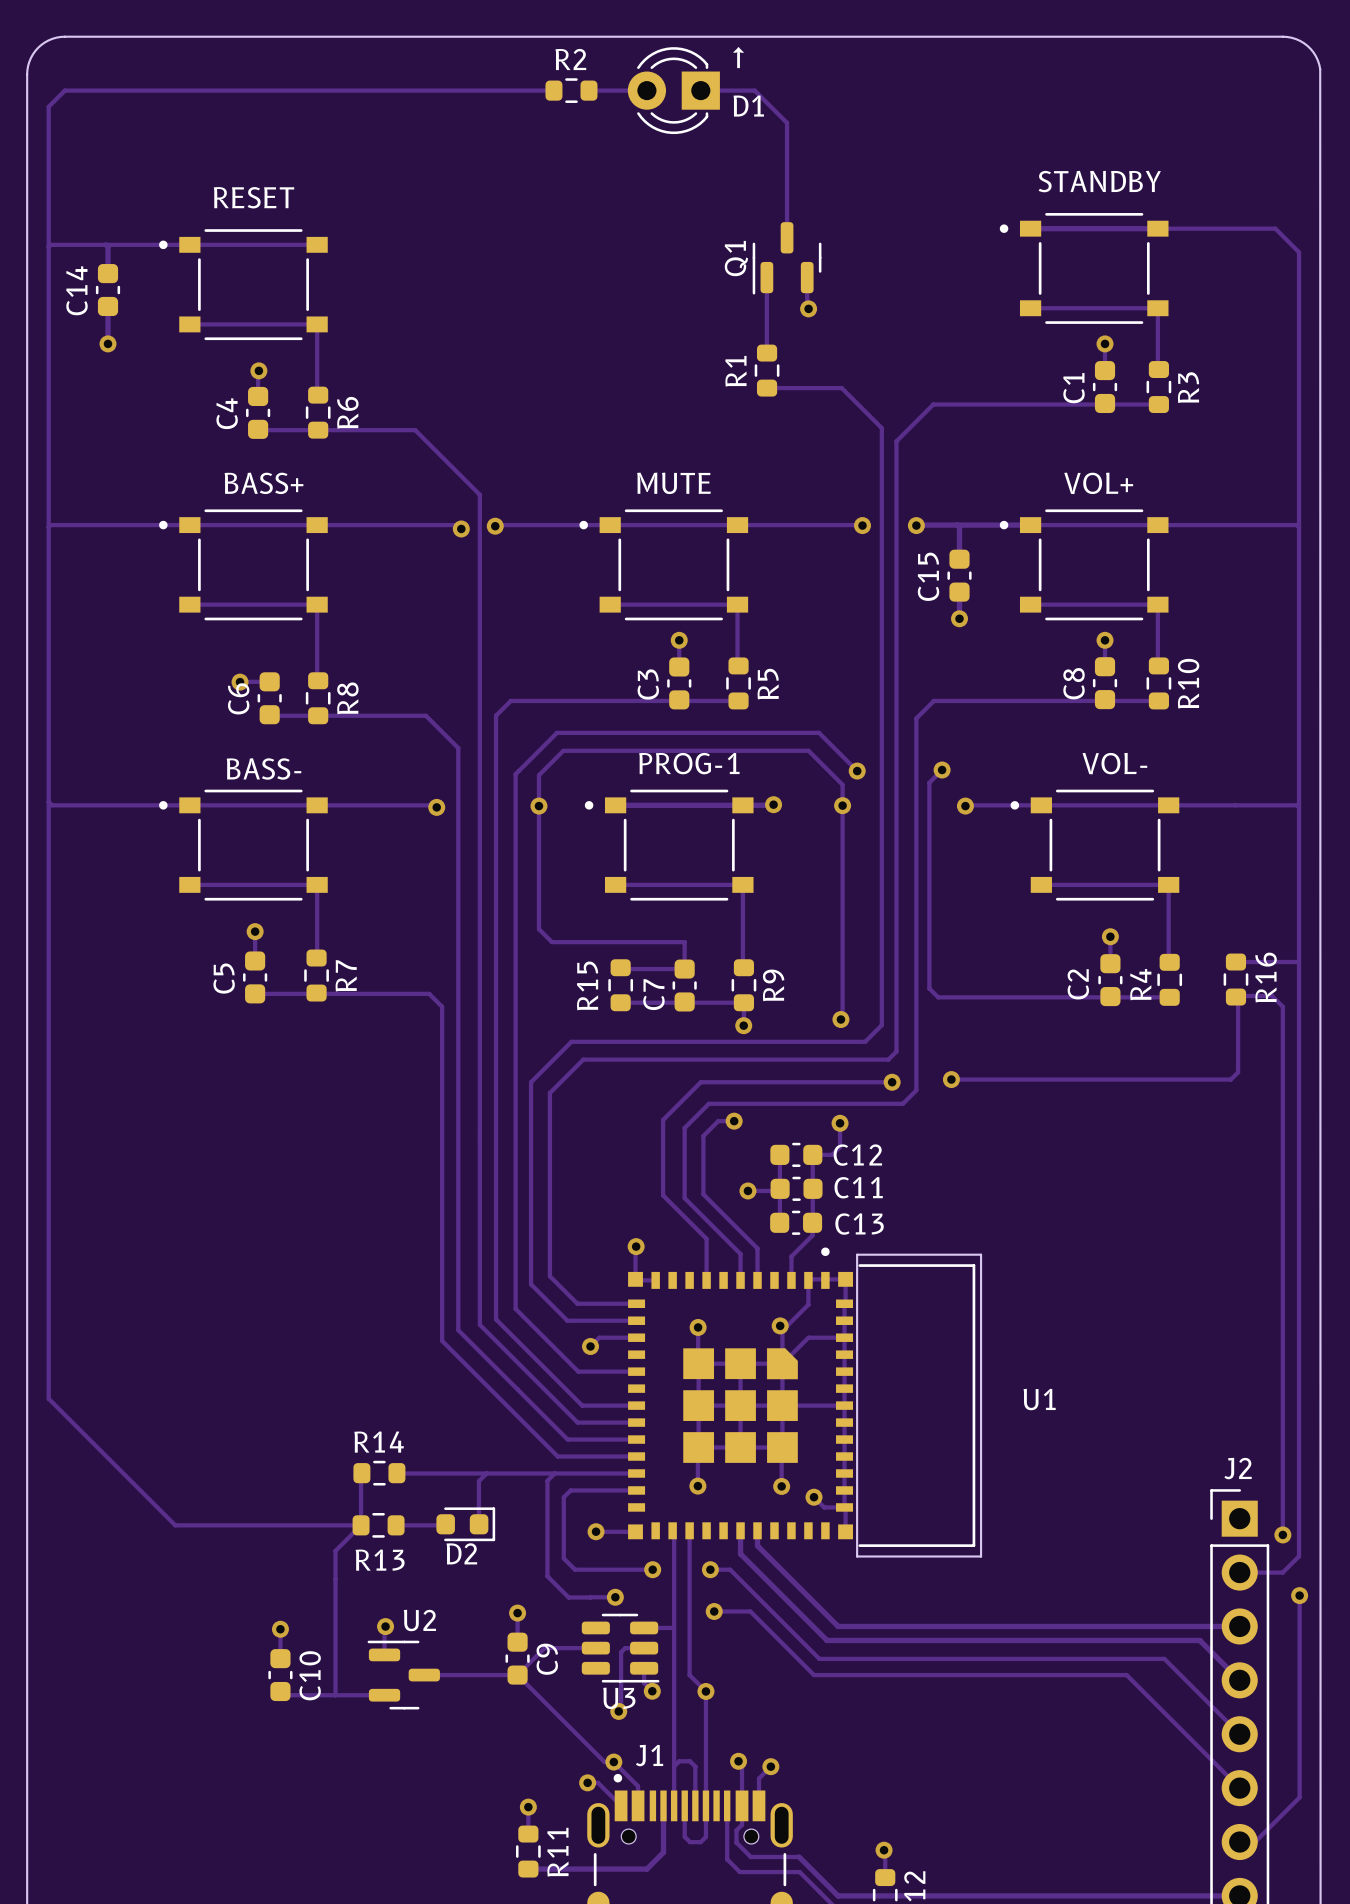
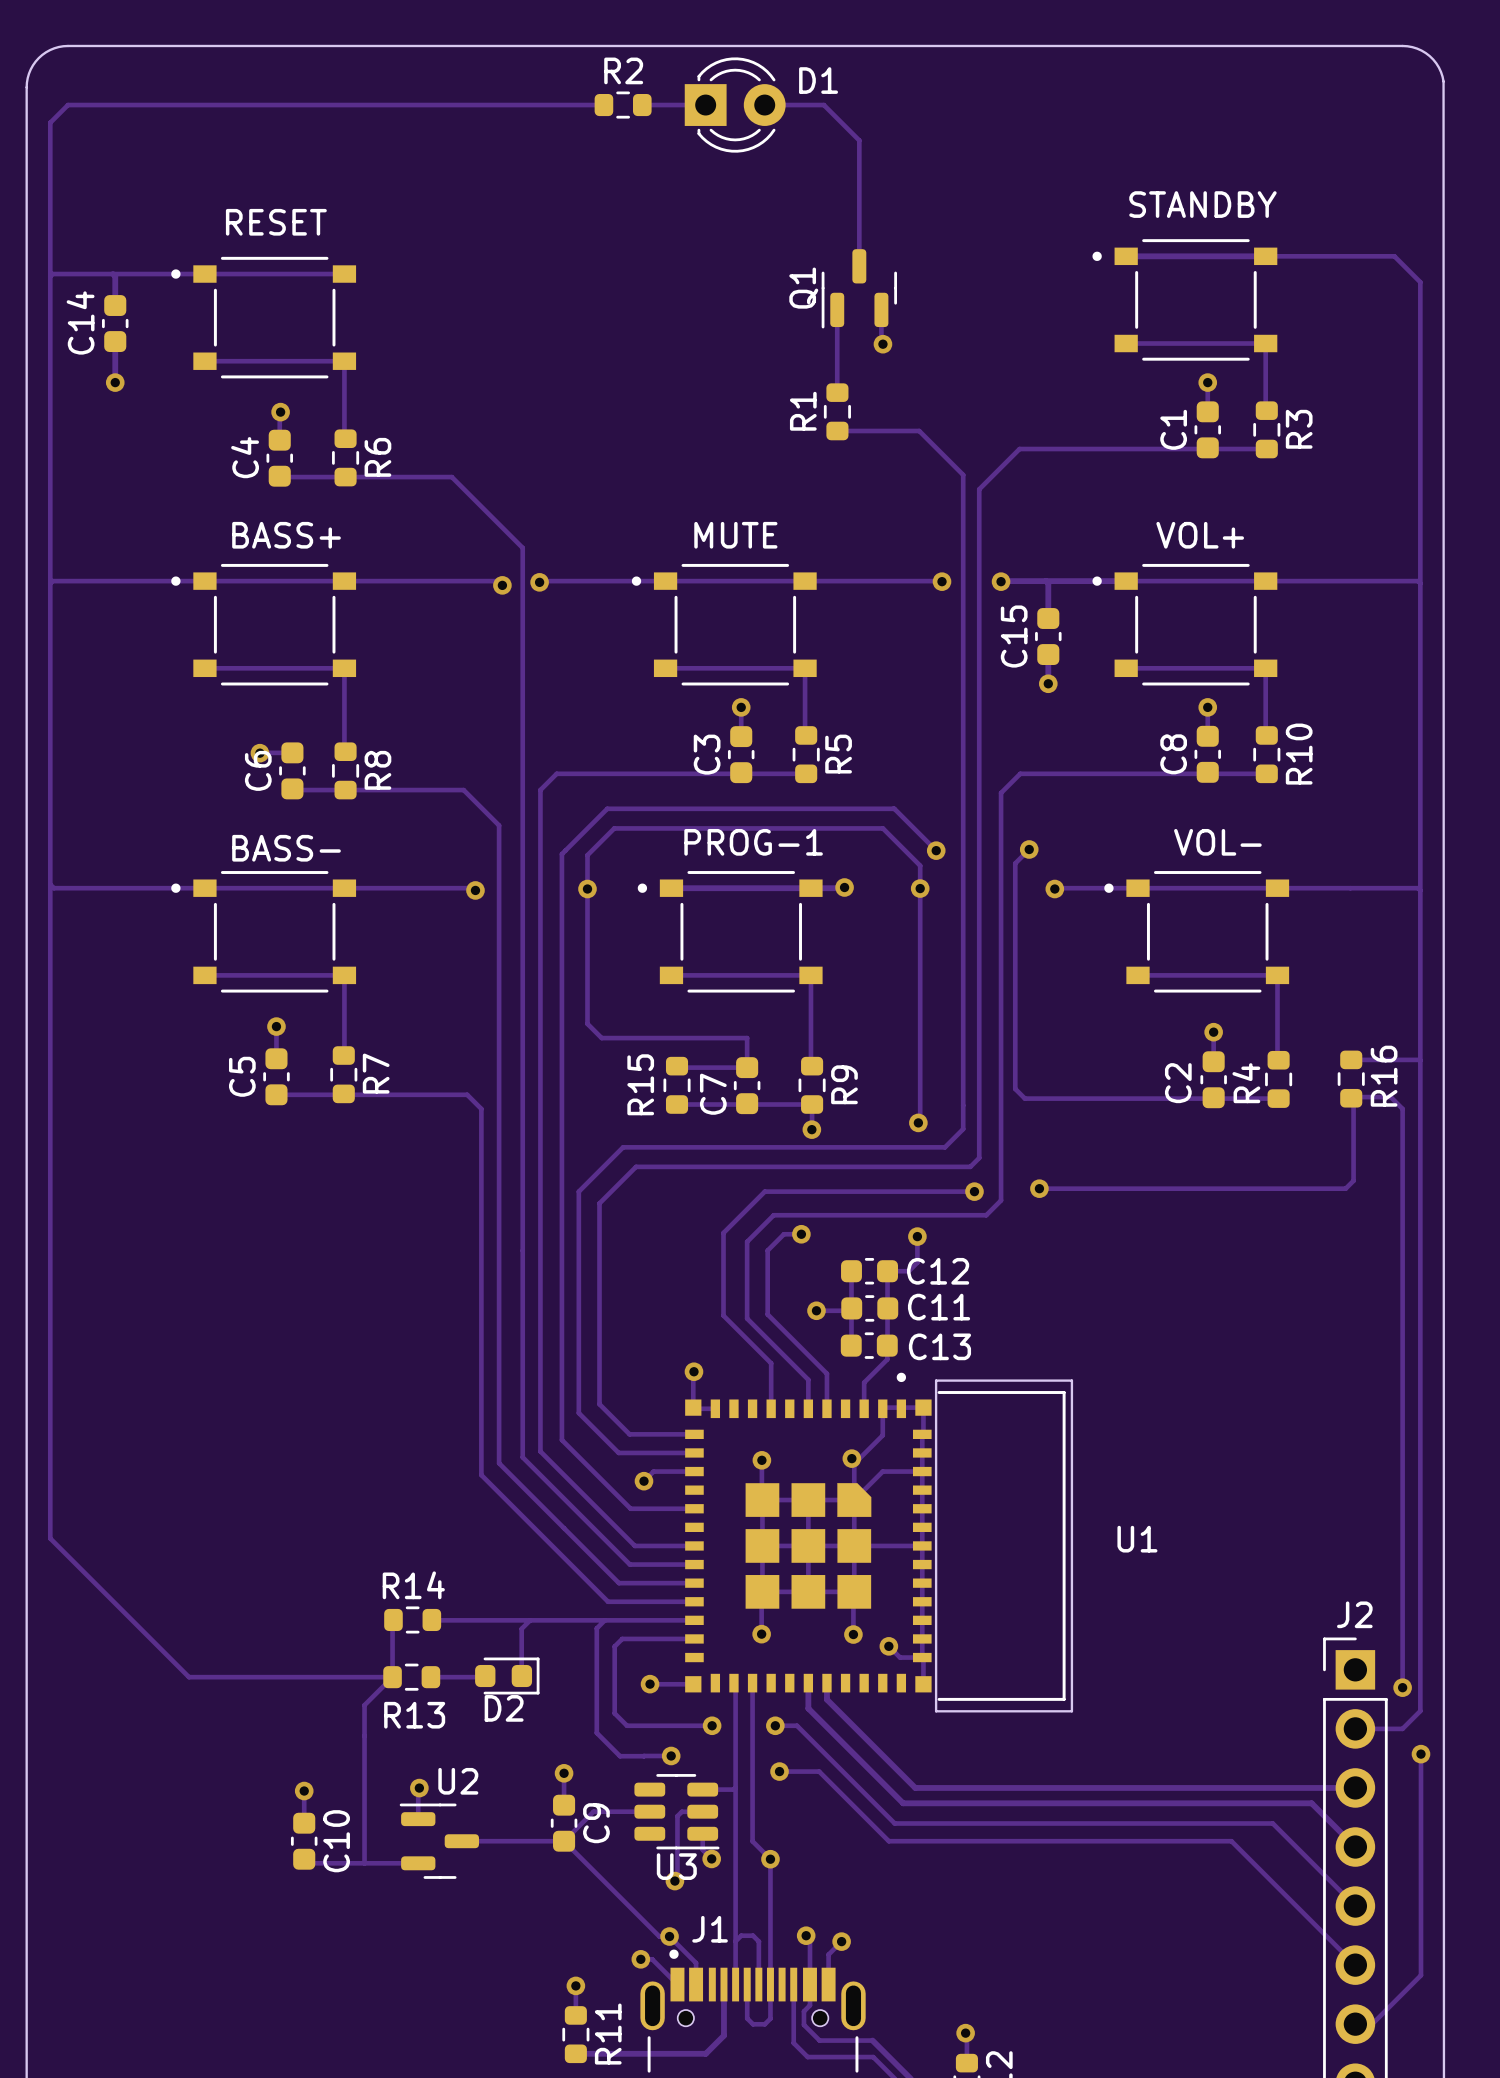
text: ↑ (738, 57) -> none
D1 rotation: 0° (673, 90) -> 180° (735, 105)

